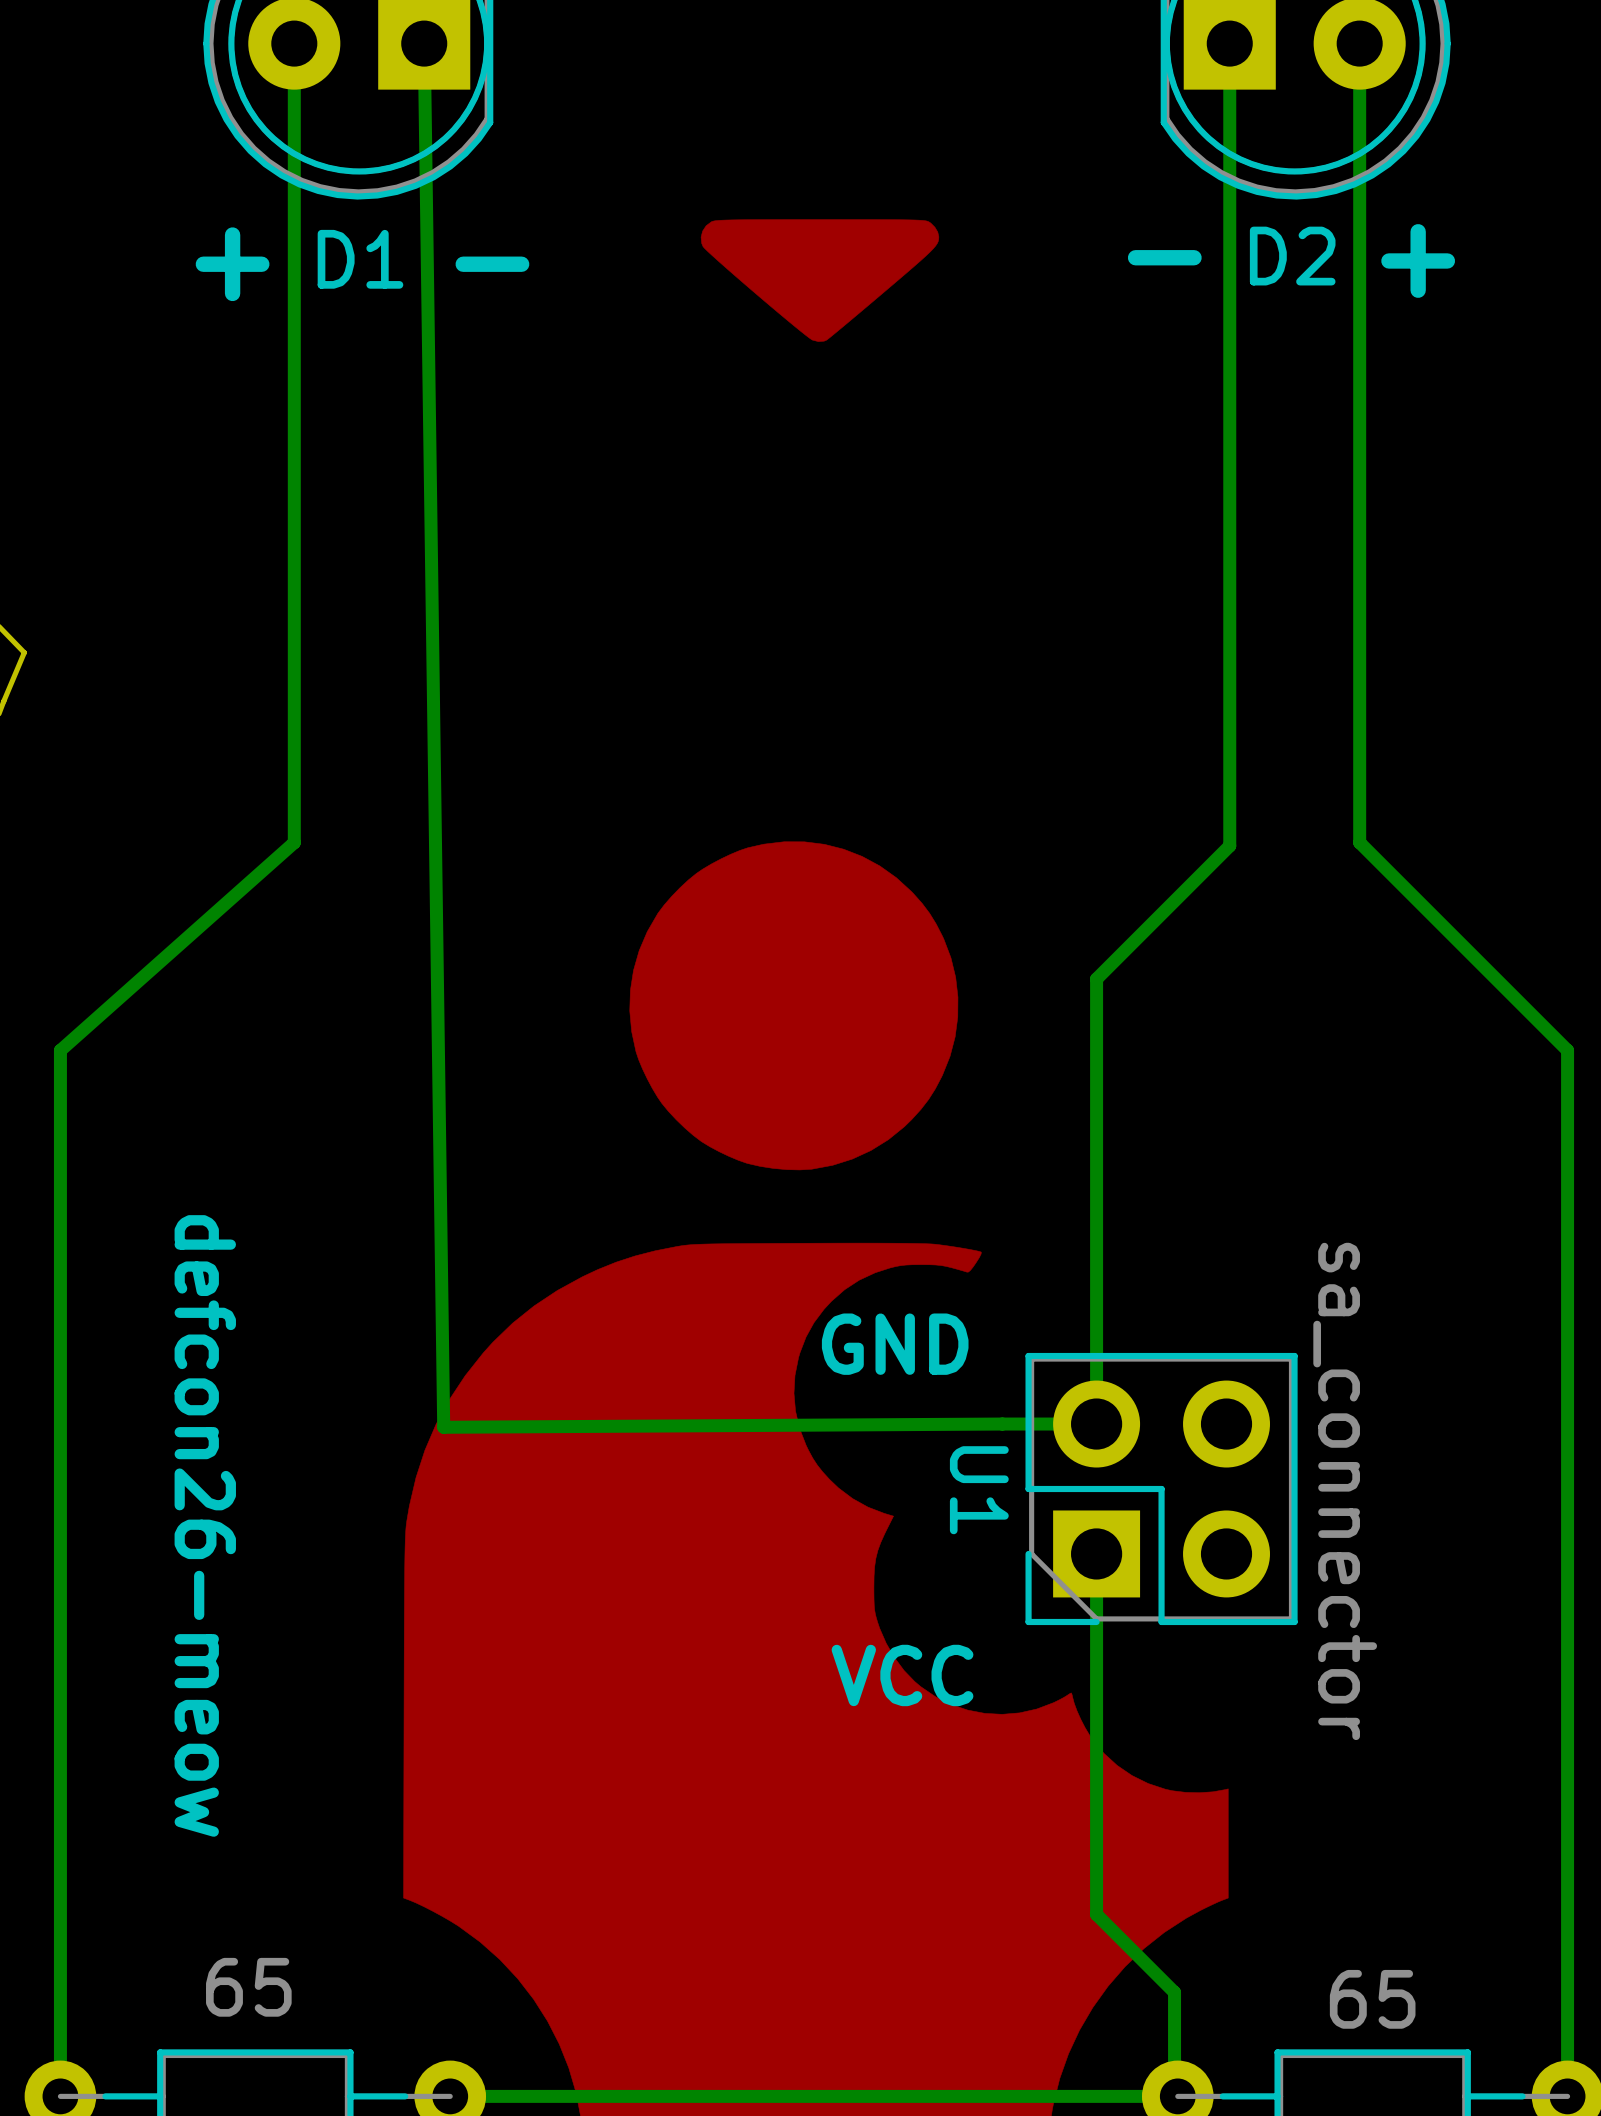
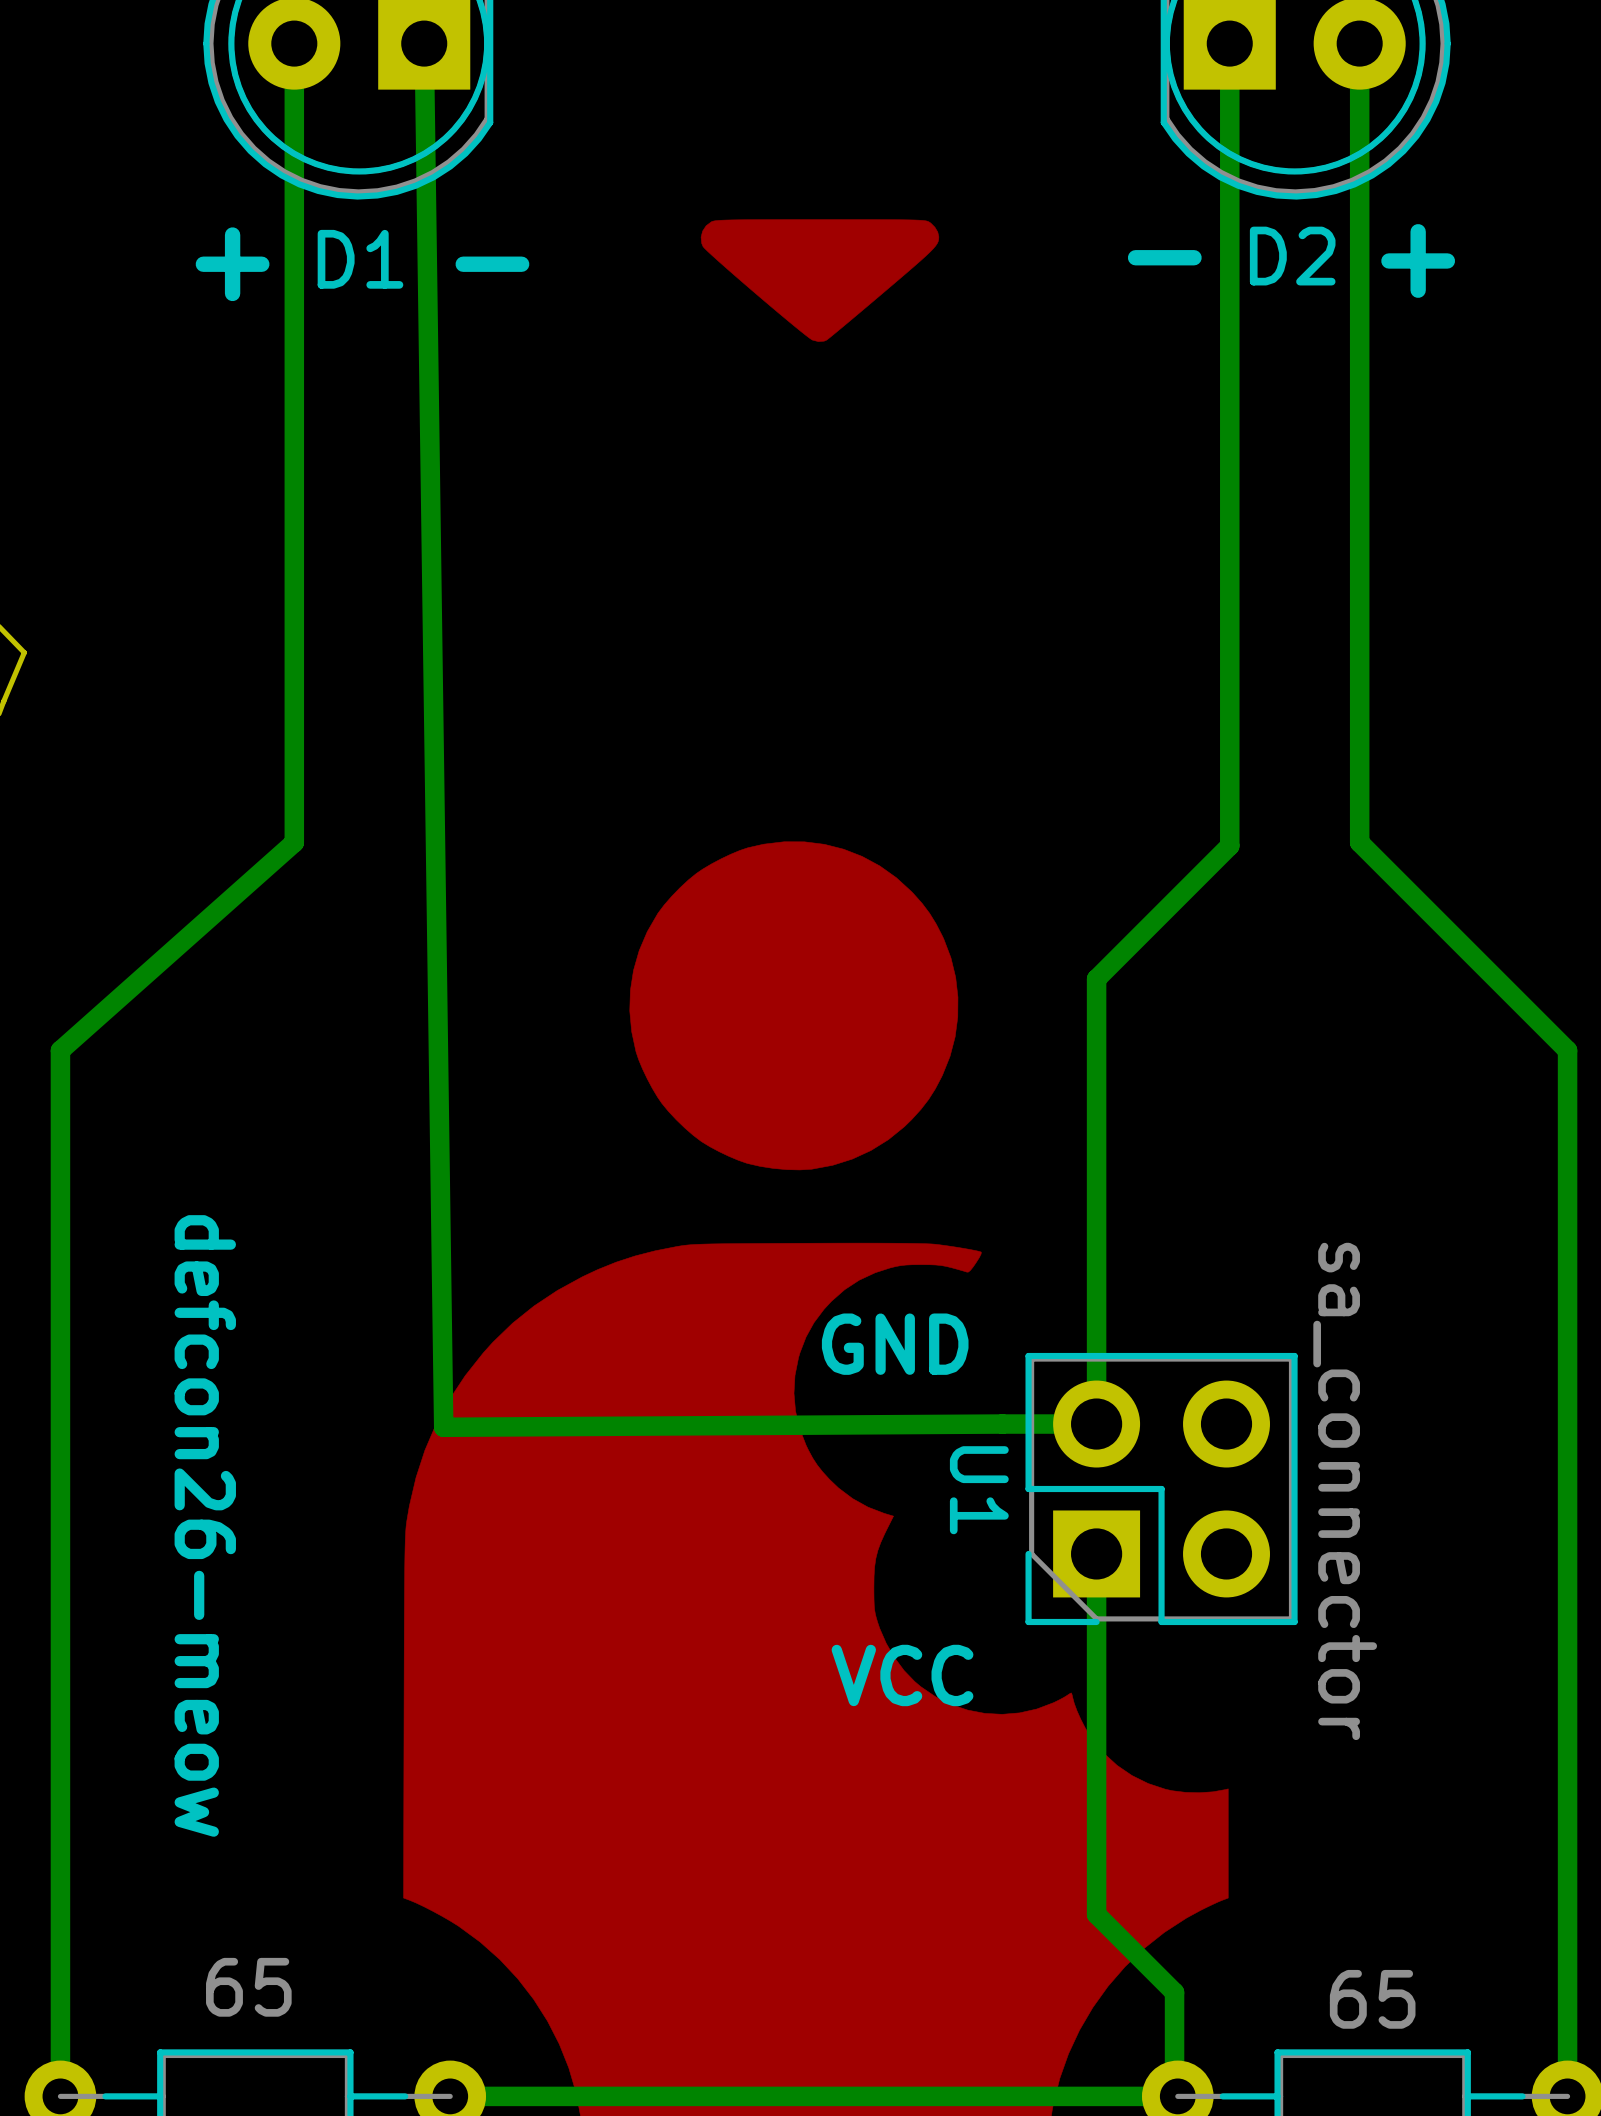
bottom track width: thin (294, 43) (294, 842) (60, 1050) (60, 2096) -> thick (294, 43) (294, 842) (60, 1050) (60, 2096)
bottom track width: thin (1229, 43) (1229, 845) (1096, 979) (1096, 1424) (443, 1427) (424, 43) -> thick (1229, 43) (1229, 845) (1096, 979) (1096, 1424) (443, 1427) (424, 43)
bottom track width: thin (1359, 43) (1359, 842) (1567, 1050) (1567, 2096) -> thick (1359, 43) (1359, 842) (1567, 1050) (1567, 2096)
bottom track width: thin (1096, 1553) (1096, 1914) (1174, 1992) (1174, 2093) (1177, 2096) (450, 2096) (450, 2089) -> thick (1096, 1553) (1096, 1914) (1174, 1992) (1174, 2093) (1177, 2096) (450, 2096) (450, 2089)

